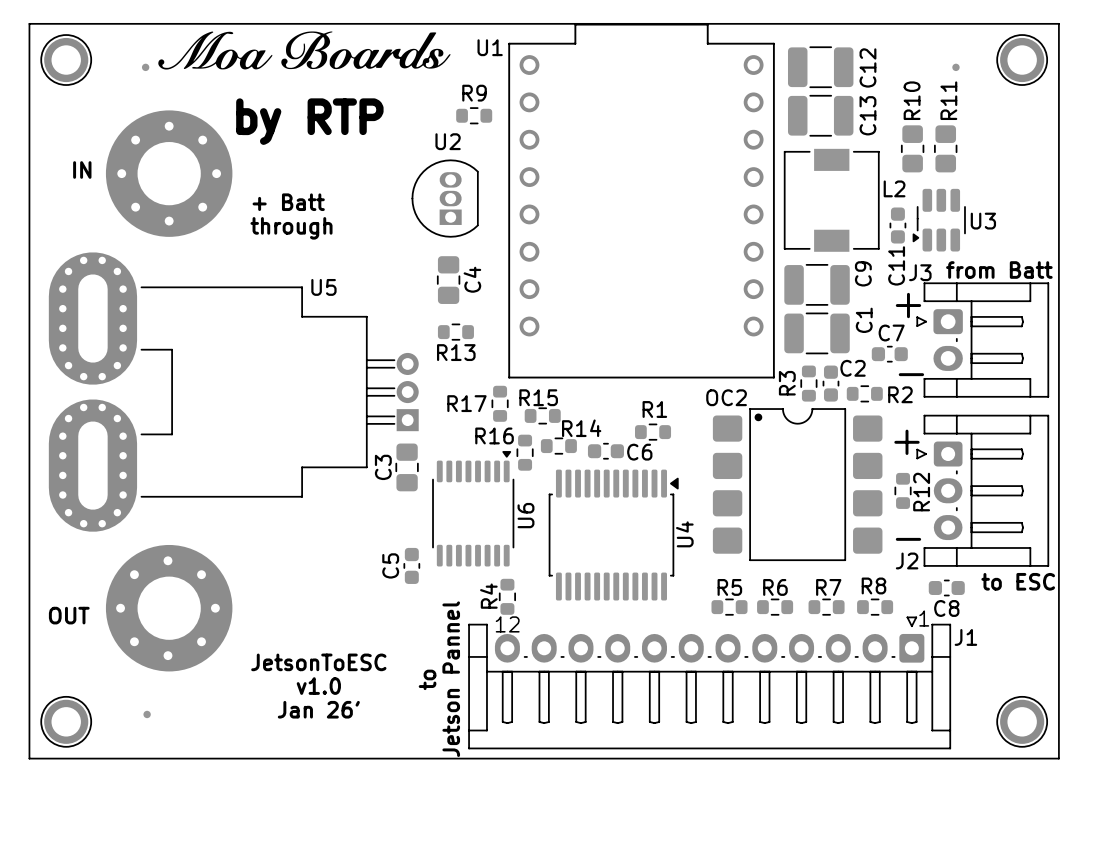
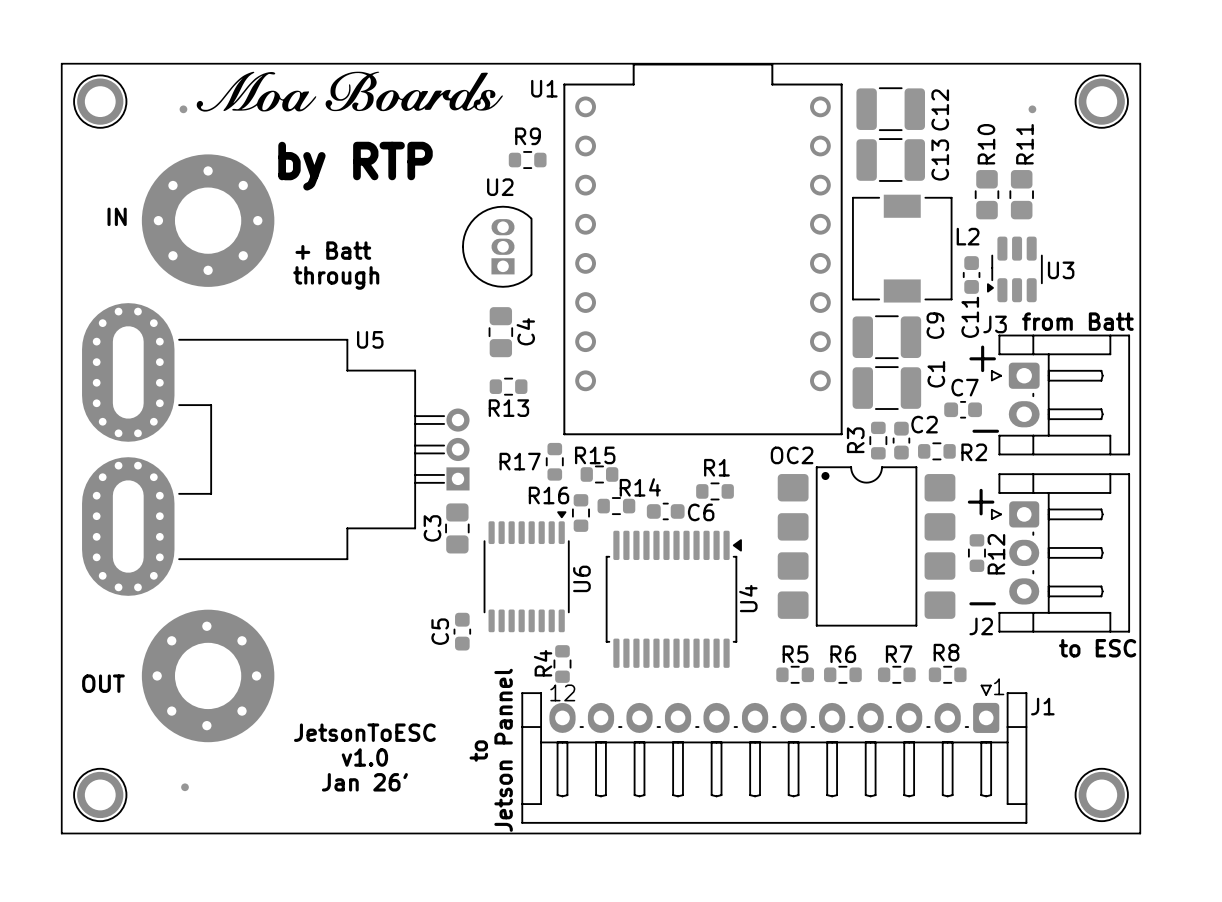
C8: (946, 587) -> none

